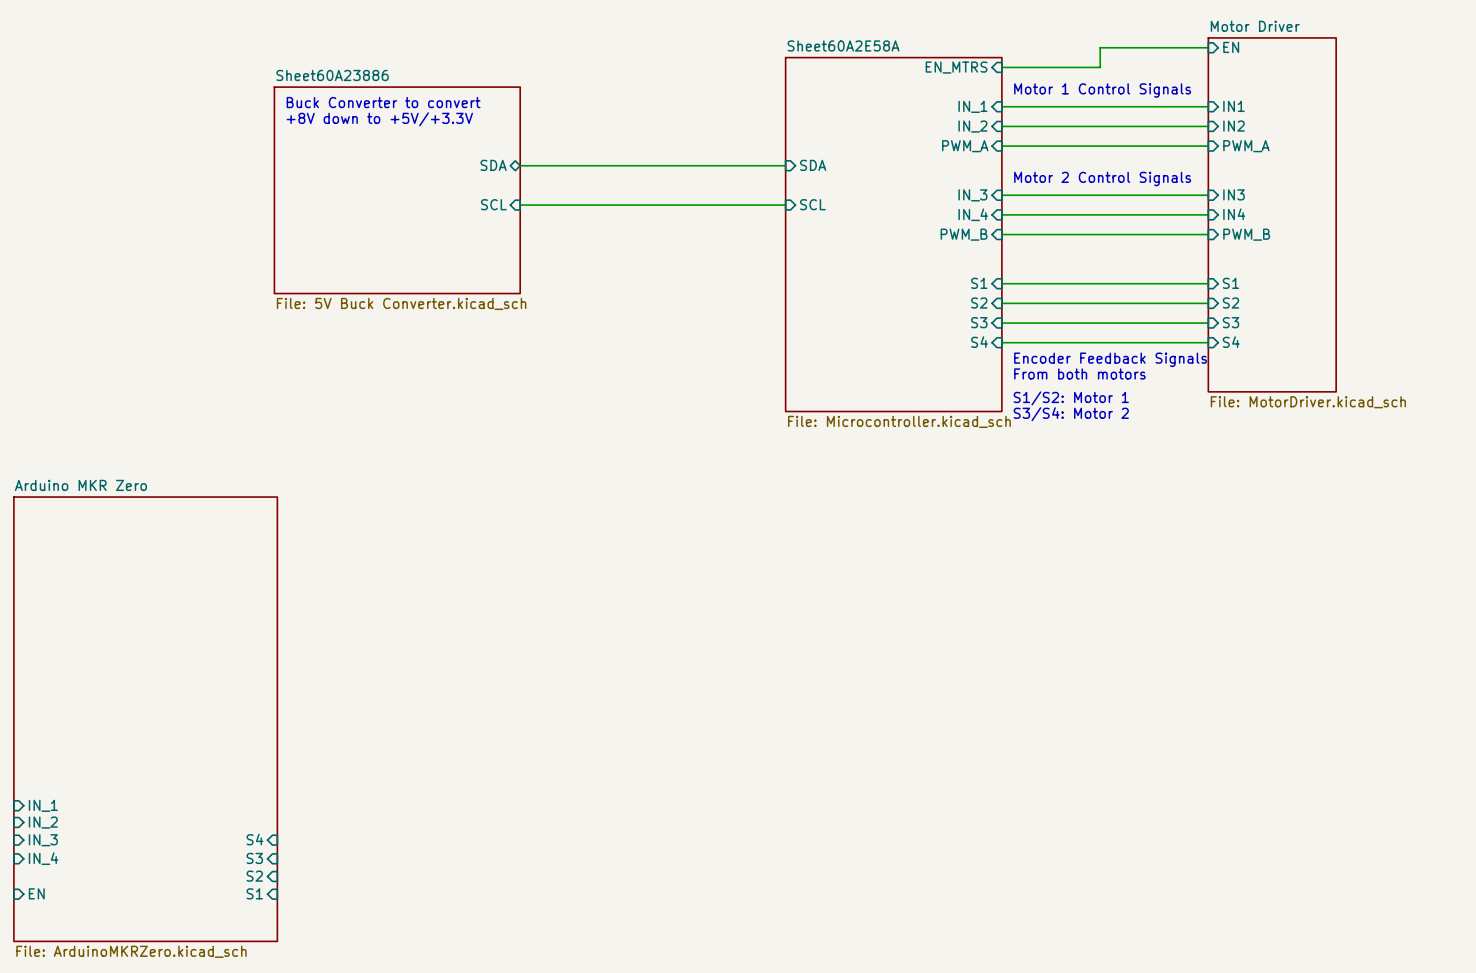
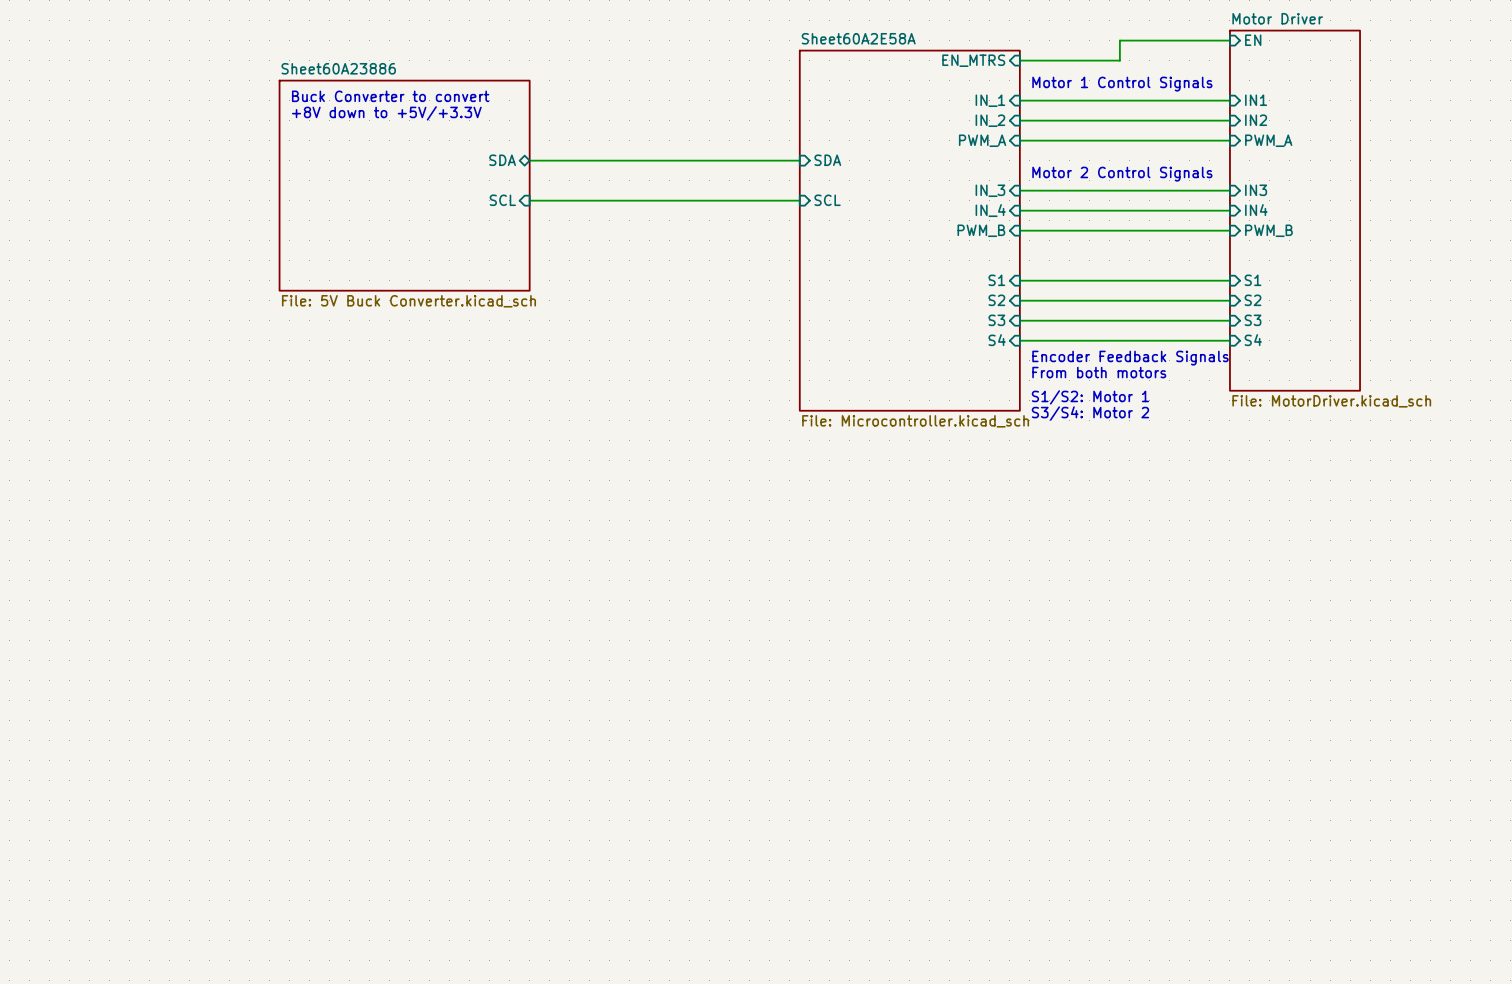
sheet Arduino MKR Zero: File: ArduinoMKRZero.kicad_sch (145, 719) -> none
sheet pin: IN_1 (43, 805) -> none
sheet pin: IN_2 (43, 822) -> none
sheet pin: S4 (254, 839) -> none
sheet pin: IN_3 (43, 840) -> none
sheet pin: IN_4 (43, 858) -> none
sheet pin: S3 (254, 858) -> none
sheet pin: S2 (254, 876) -> none
sheet pin: EN (36, 893) -> none
sheet pin: S1 (254, 893) -> none

